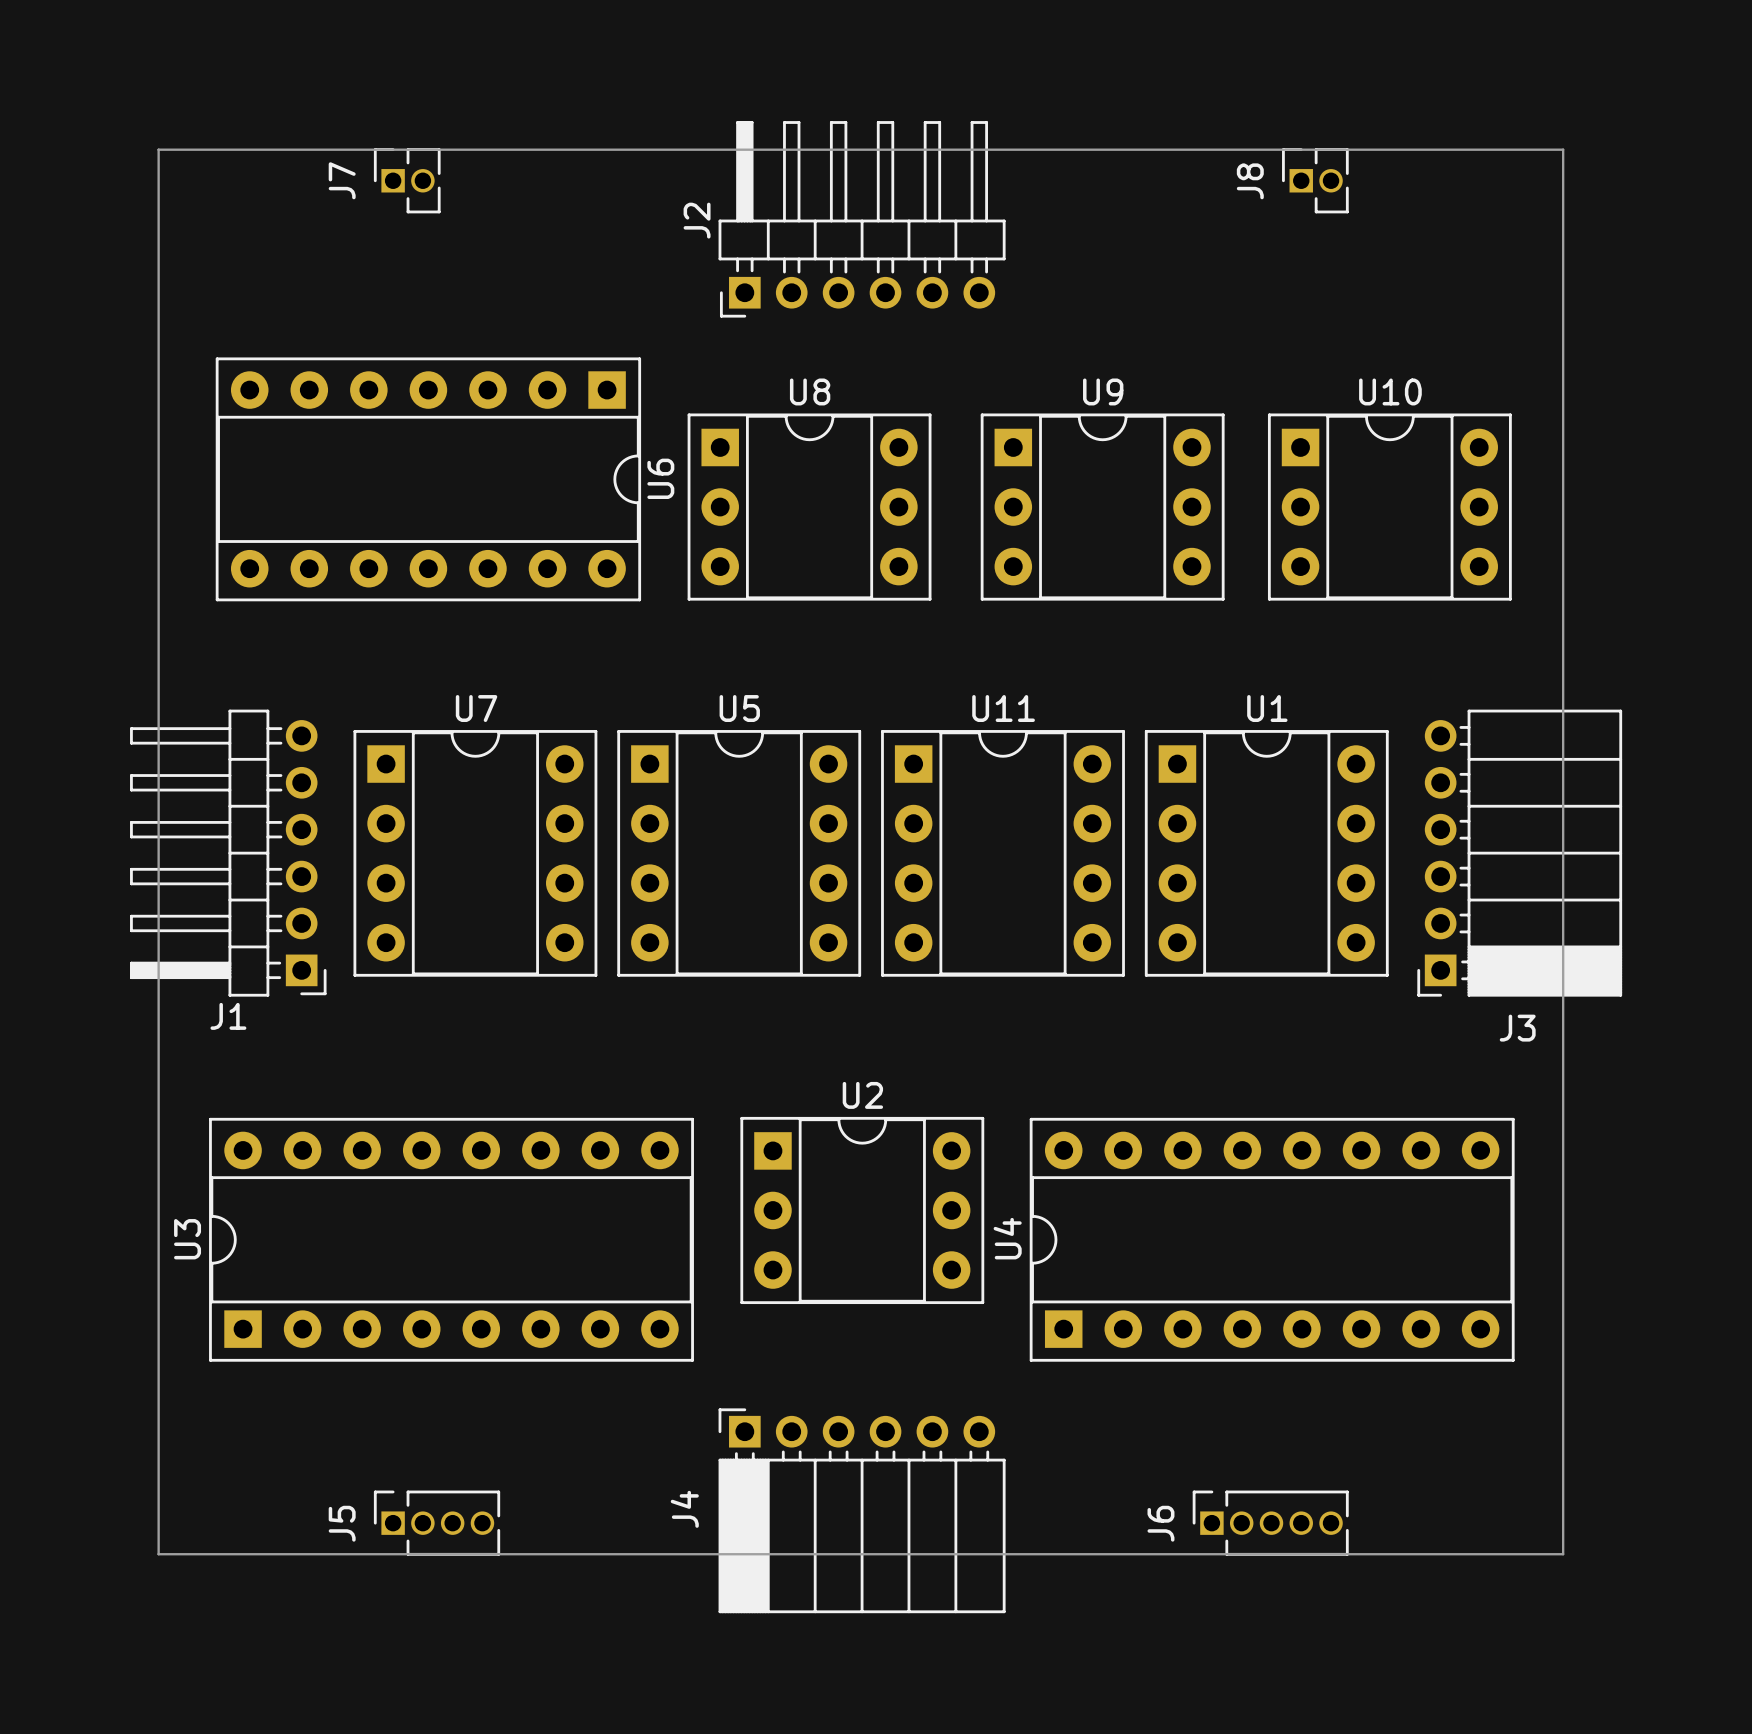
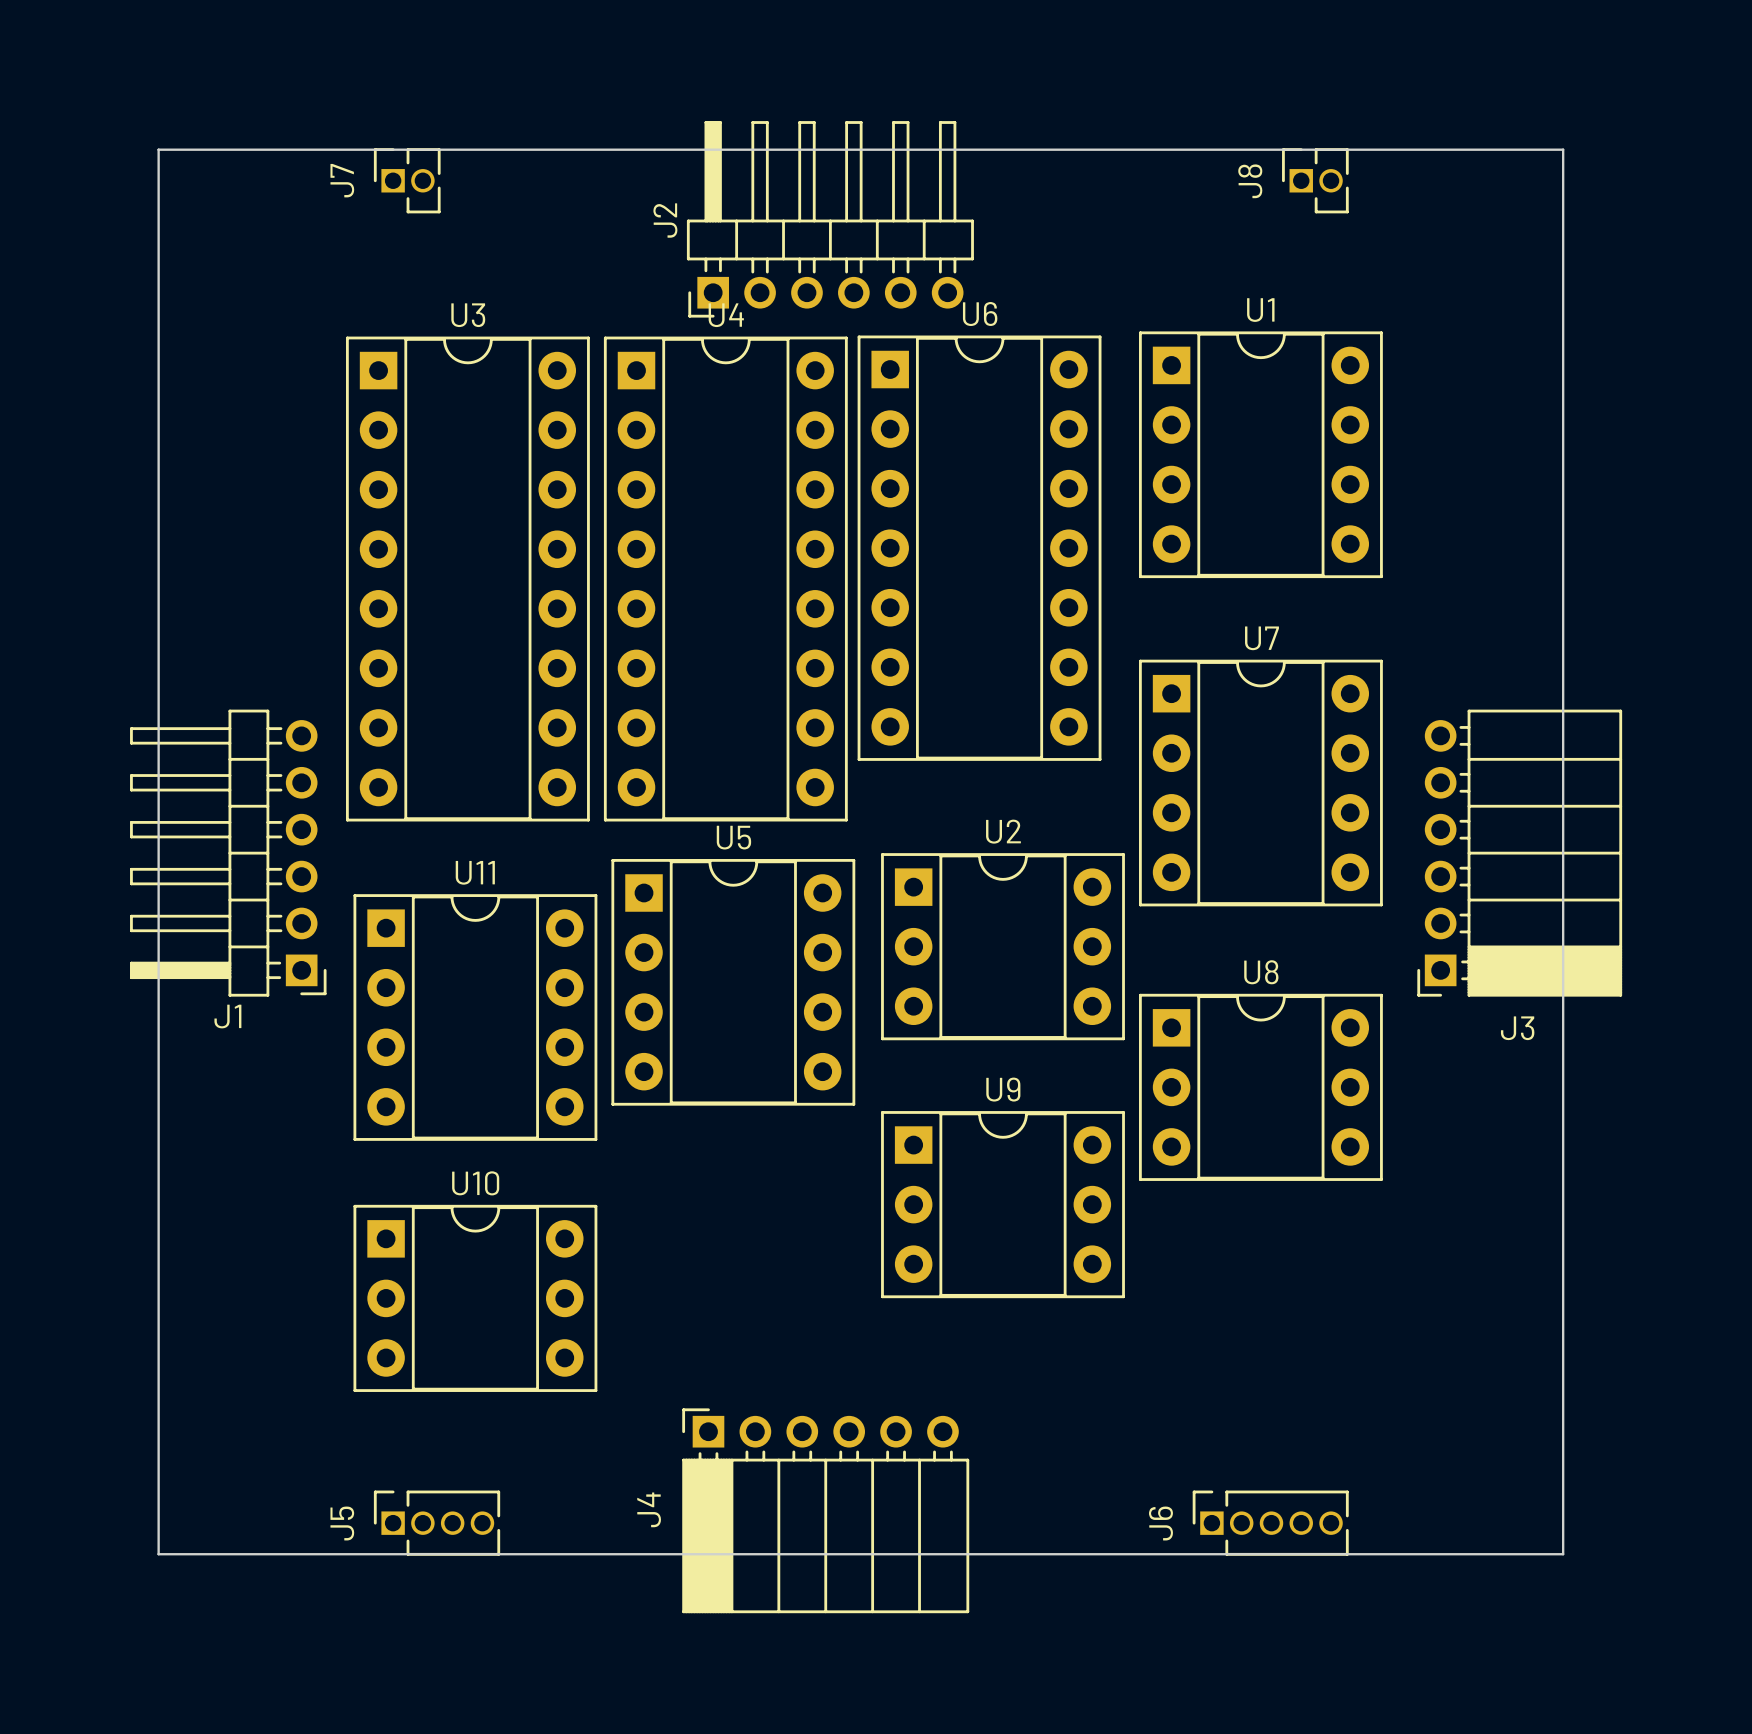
J2 position: (862, 219) -> (830, 219)
U6 rotation: 0° (428, 479) -> 90° counterclockwise (979, 548)
U6 position: (428, 479) -> (979, 548)
U8 position: (809, 507) -> (1260, 1087)
U9 position: (1102, 507) -> (1002, 1204)
U10 position: (1389, 507) -> (475, 1298)
U7 position: (475, 853) -> (1260, 783)
U5 position: (739, 853) -> (733, 982)
U11 position: (1002, 853) -> (475, 1017)
U1 position: (1266, 853) -> (1260, 454)
U2 position: (862, 1210) -> (1002, 946)
U3 rotation: 0° (451, 1239) -> 90° clockwise (467, 579)
U3 position: (451, 1239) -> (467, 579)
U4 rotation: 0° (1272, 1239) -> 90° clockwise (725, 579)
U4 position: (1272, 1239) -> (725, 579)
J4 position: (862, 1510) -> (825, 1510)

